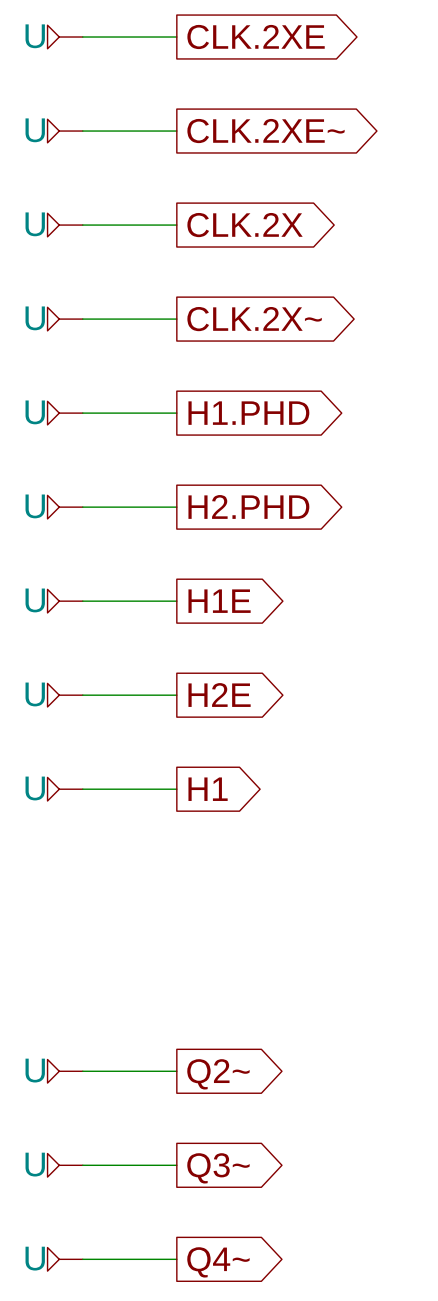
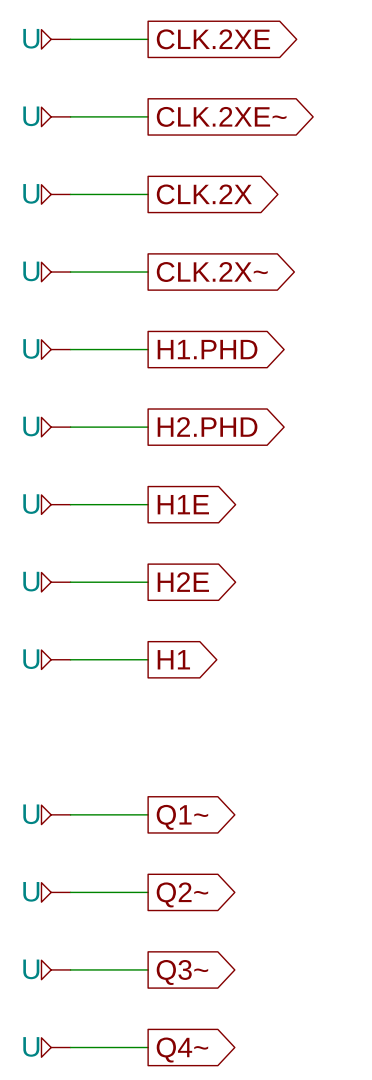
U: none -> (55, 814)
wire: none -> (70, 814) (148, 814)
global label: none -> Q1~ (182, 817)

